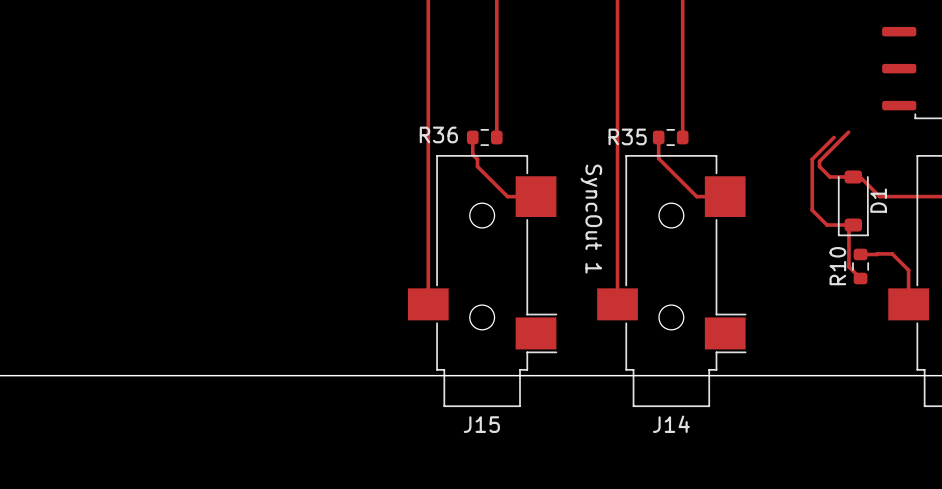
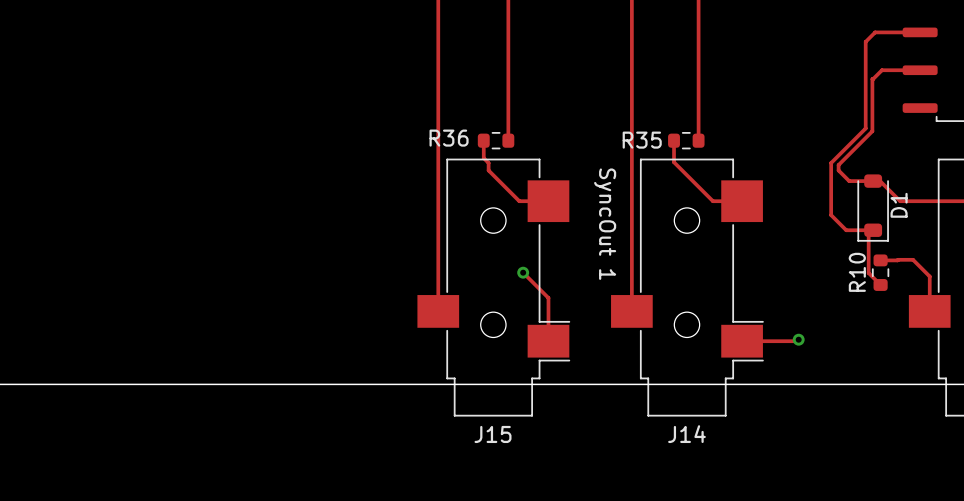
track: none -> (920, 32) (875, 32) (865, 41) (865, 128) (853, 140)
track: none -> (920, 70) (881, 70) (872, 79) (872, 131) (868, 135)
track: none -> (523, 272) (548, 298) (548, 341)
via: none -> (523, 272)
track: none -> (798, 339) (742, 341)
via: none -> (798, 339)

